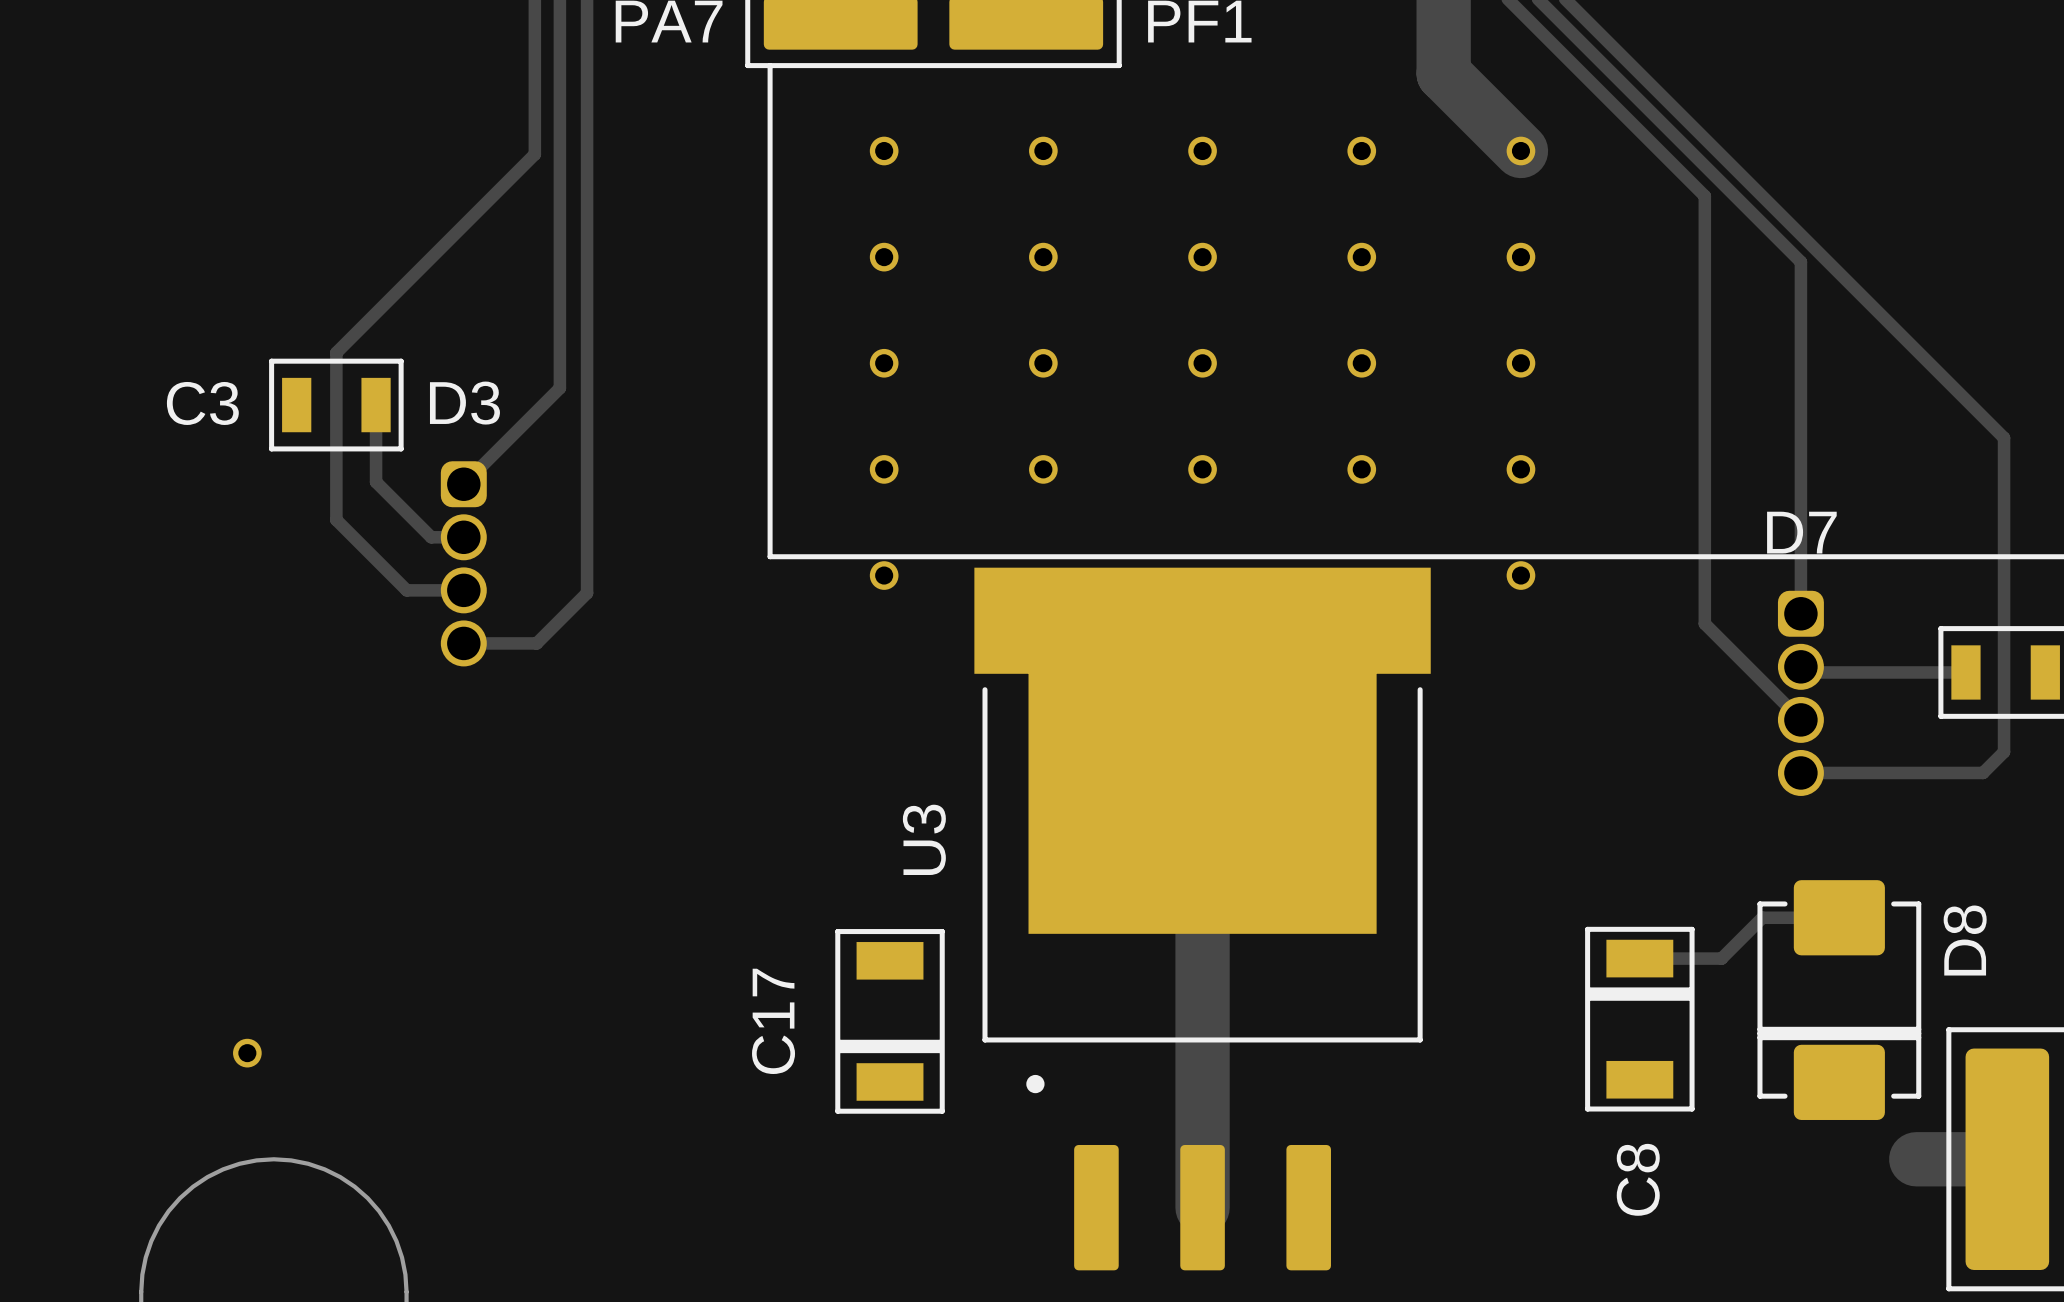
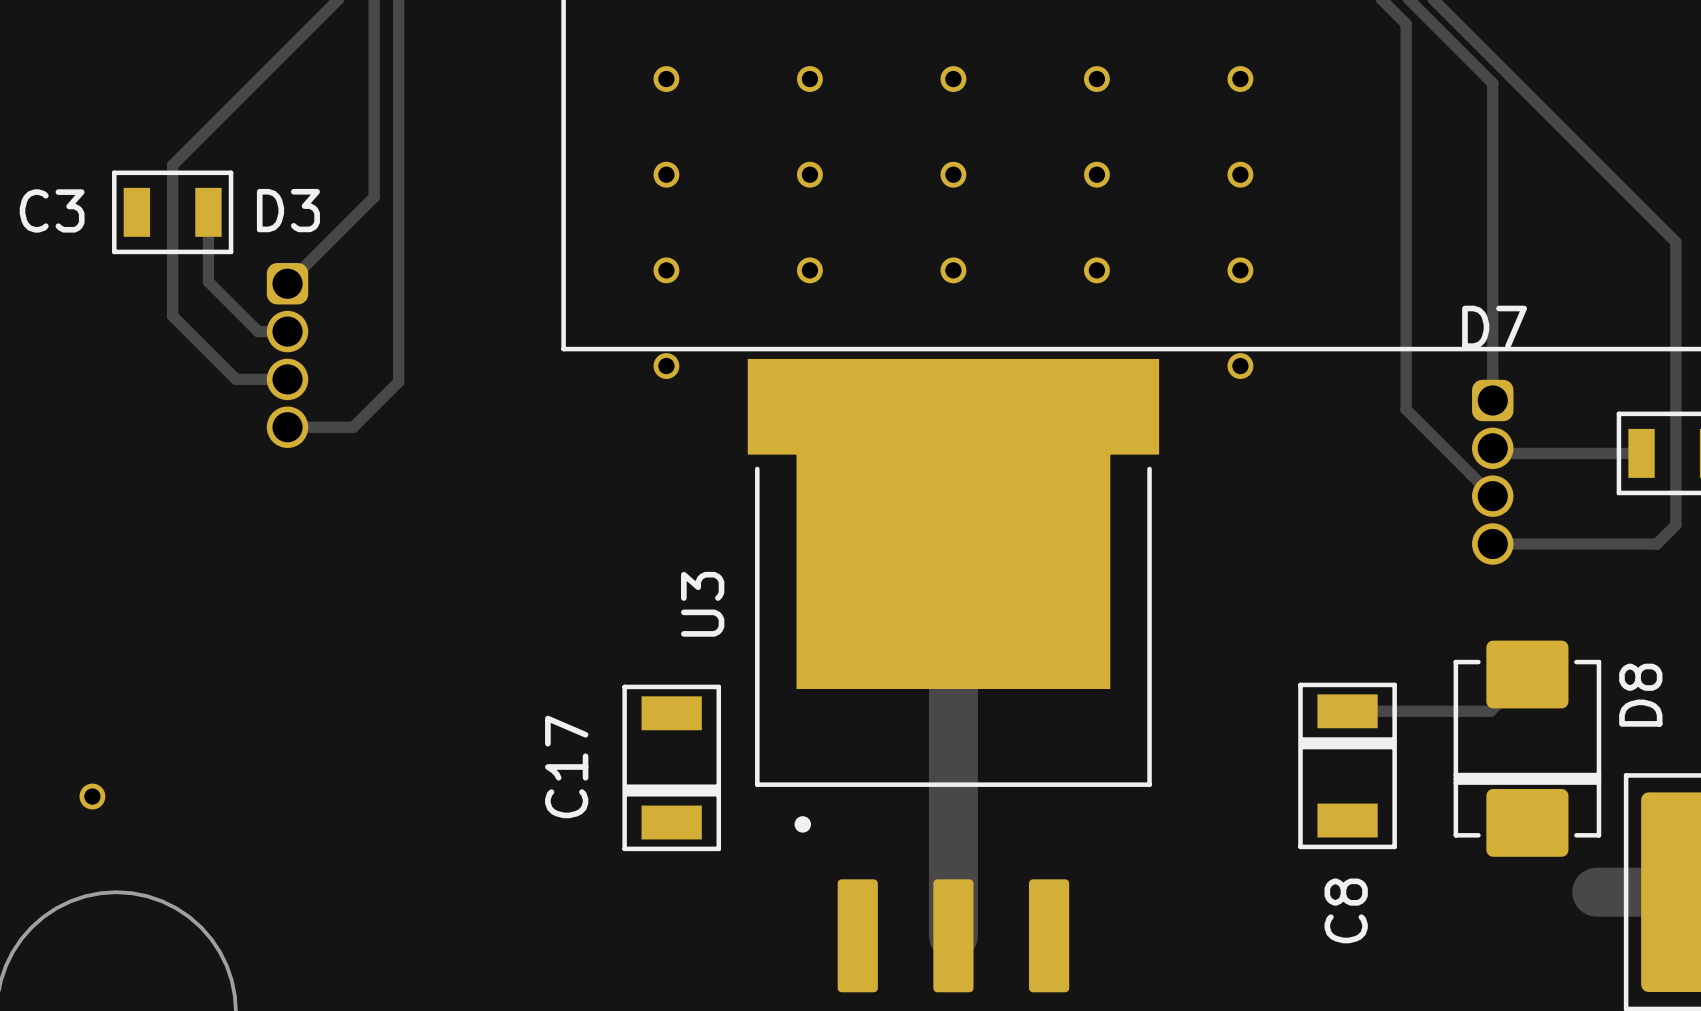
track: (1839, 917) (1762, 917) (1721, 958) -> (1527, 674) (1490, 711) (1421, 711)

